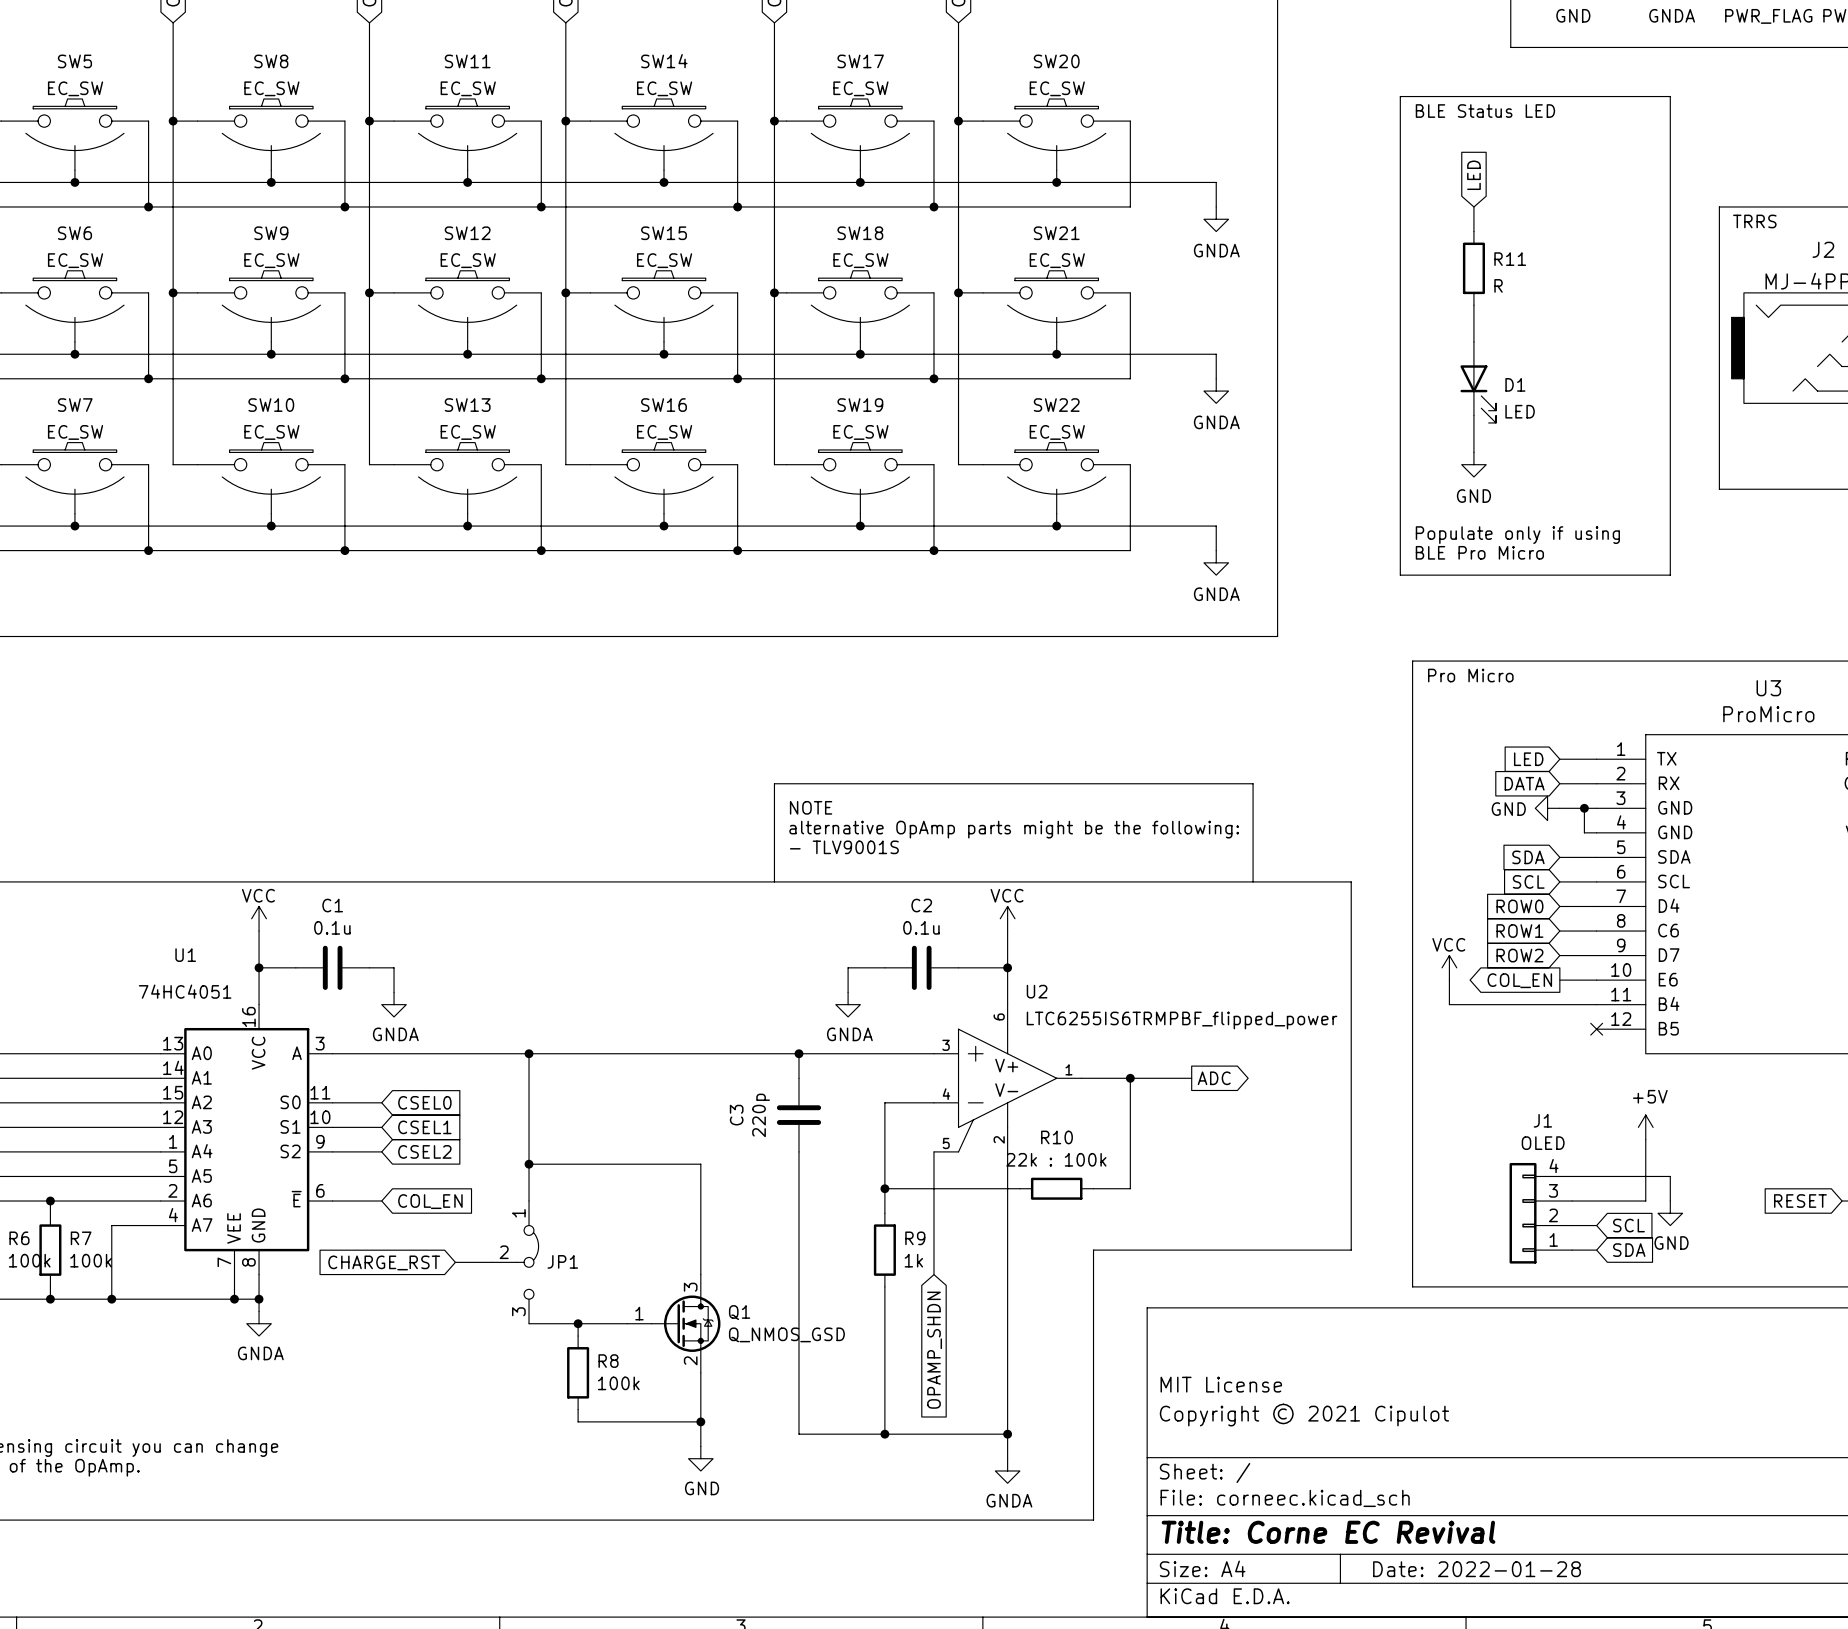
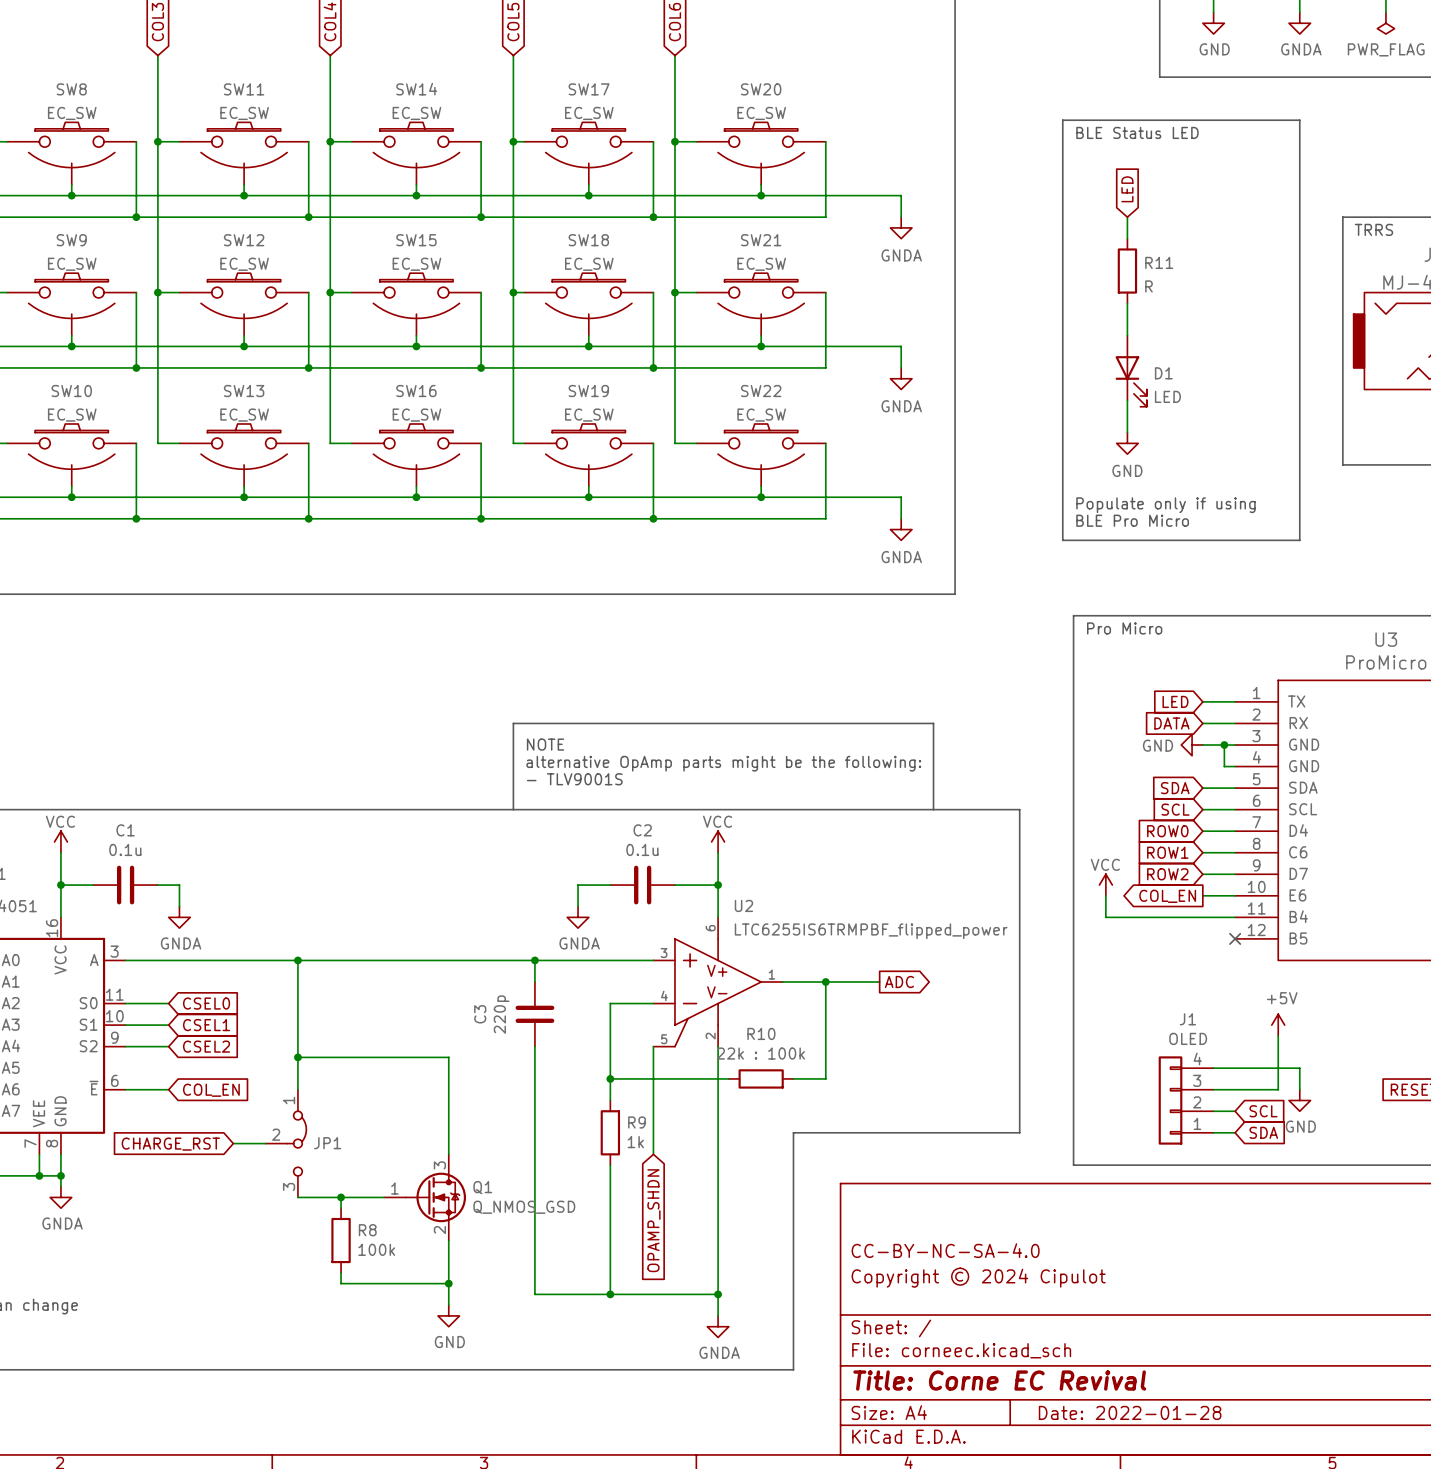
title block: MIT License (1221, 1384) -> CC-BY-NC-SA-4.0 (945, 1250)
title block: Copyright © 2021 Cipulot (1304, 1415) -> Copyright © 2024 Cipulot (978, 1277)

